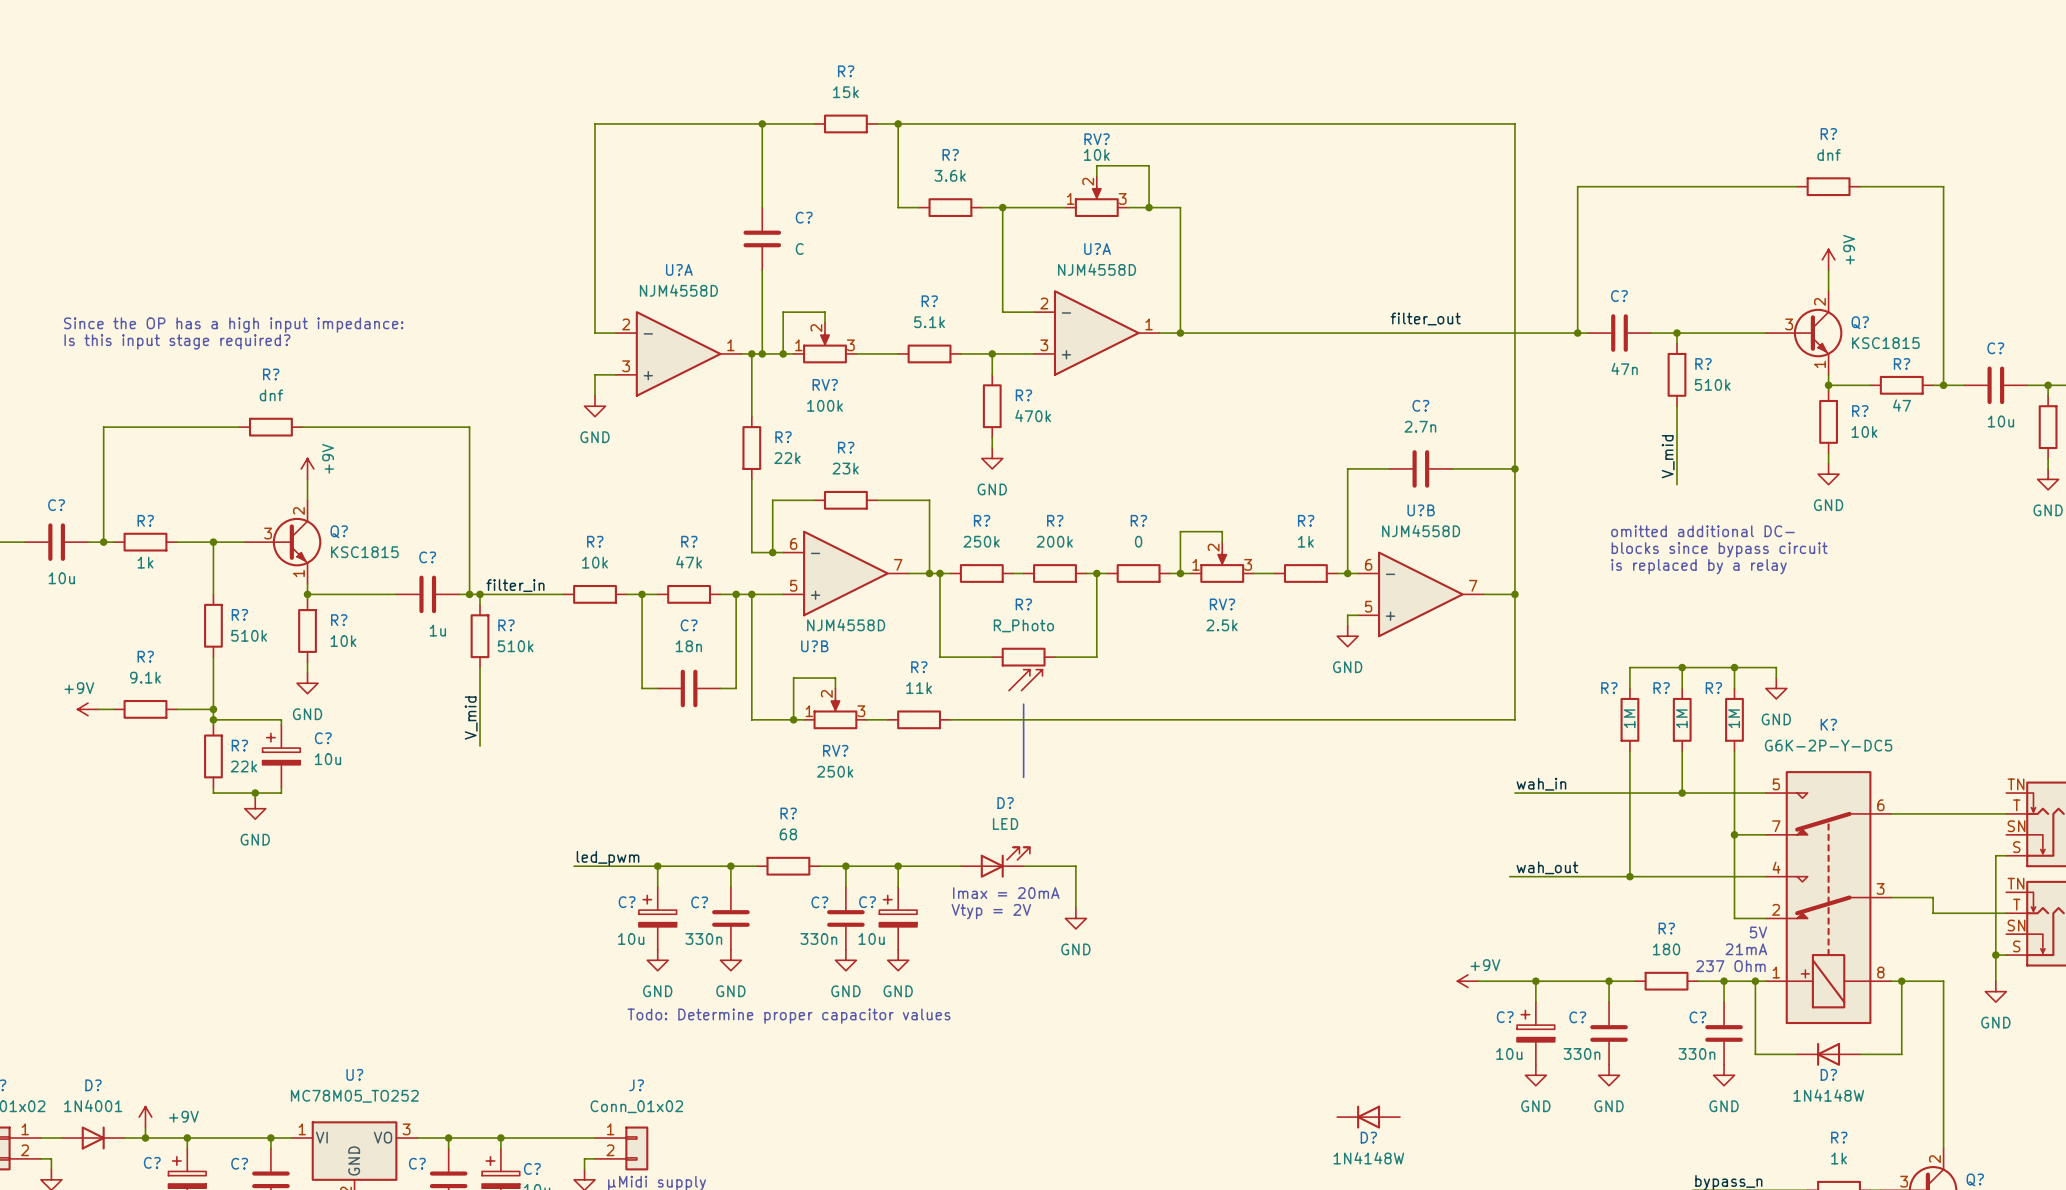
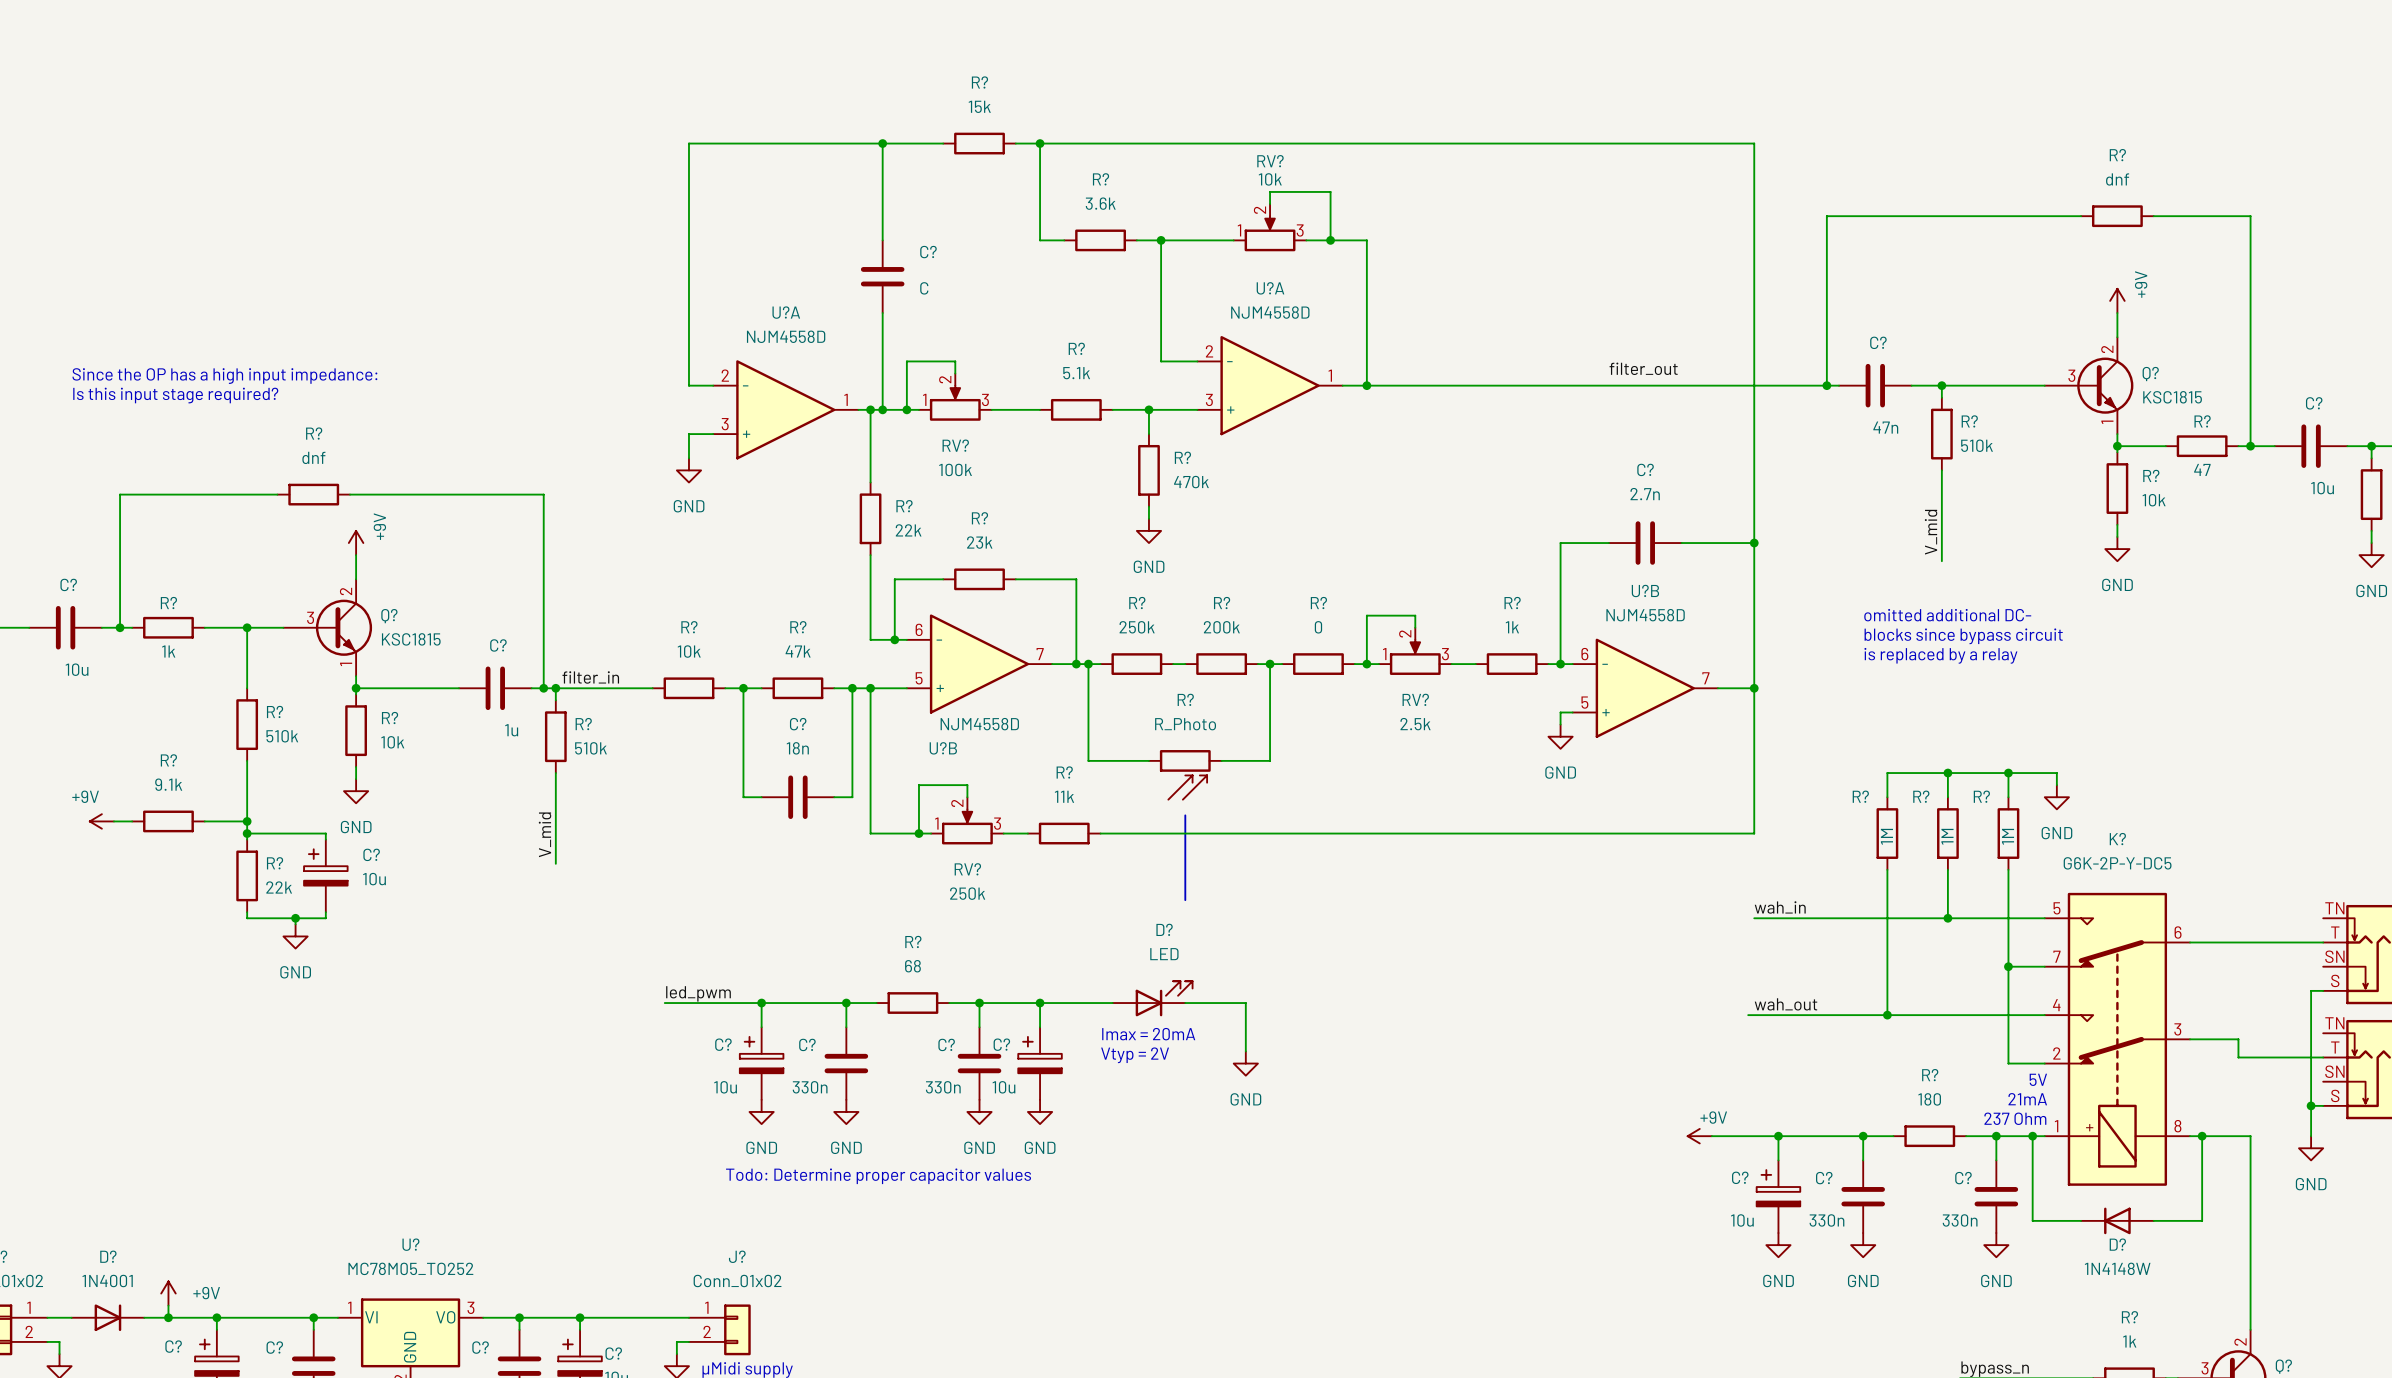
D?: 1N4148W (1368, 1117) -> none

